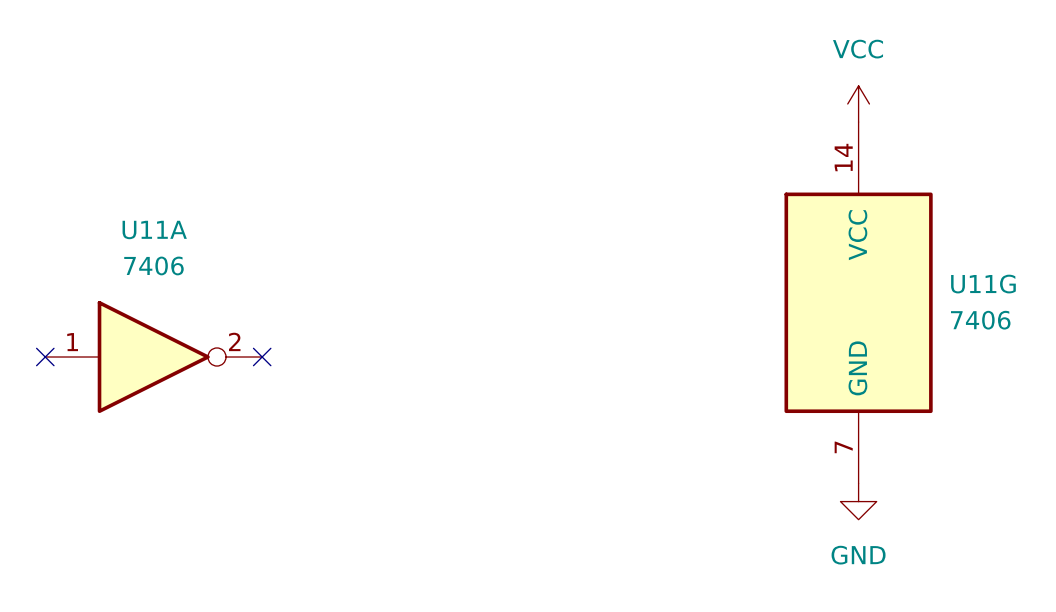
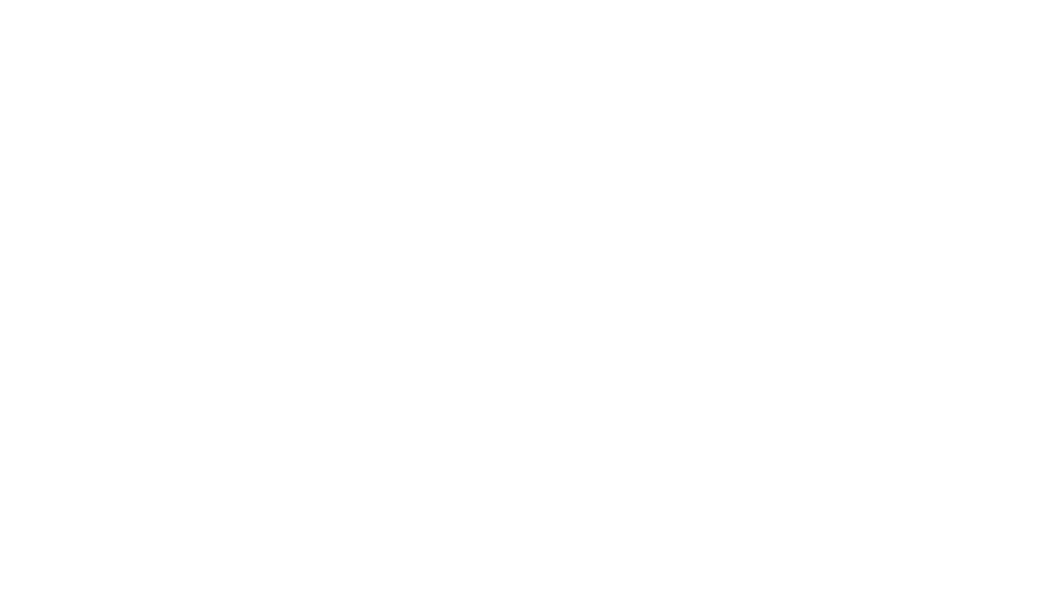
power symbol: VCC (858, 103) -> none
U11G: 7406 (858, 302) -> none
no-connect mark: (45, 357) -> none
U11A: 7406 (153, 357) -> none
no-connect mark: (262, 357) -> none
power symbol: GND (858, 501) -> none

